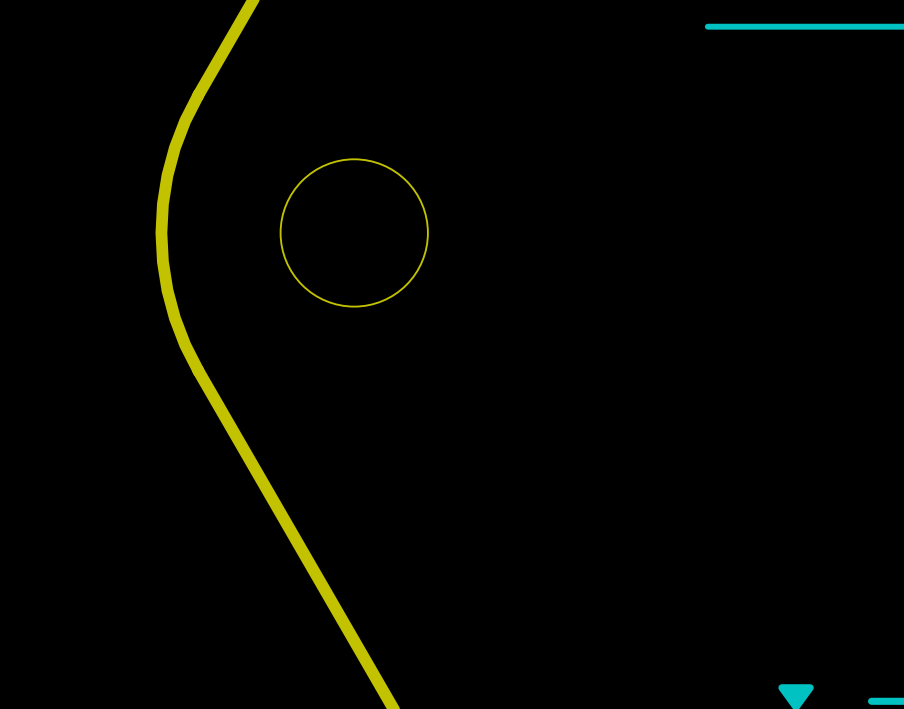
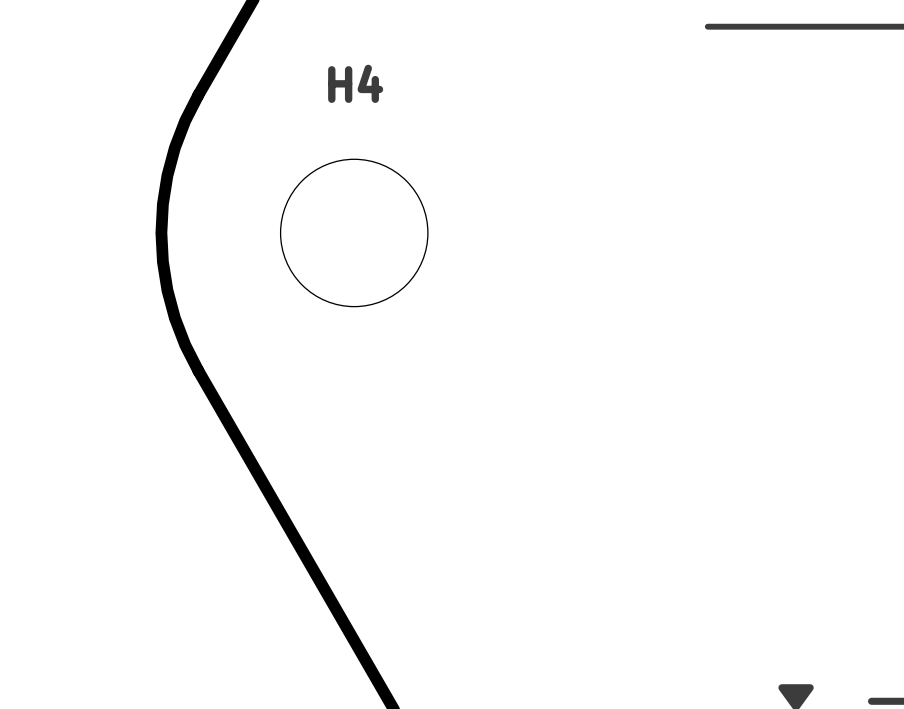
H4 name: none -> H4 (355, 83)

